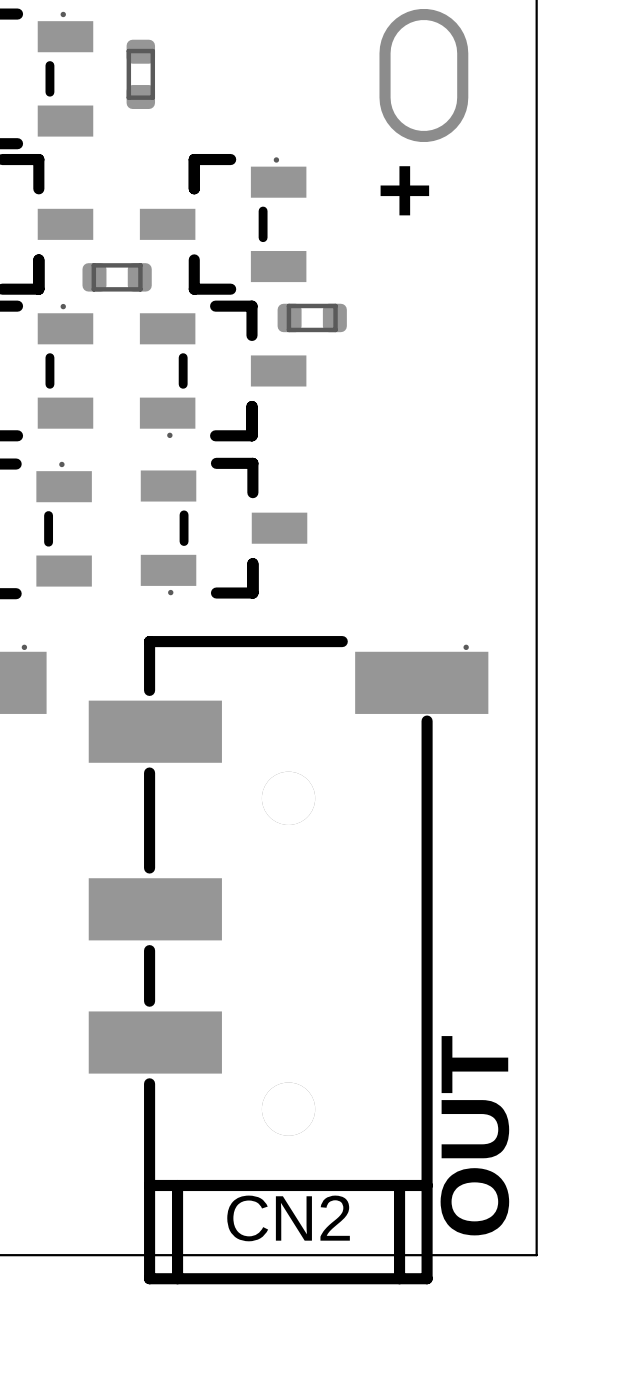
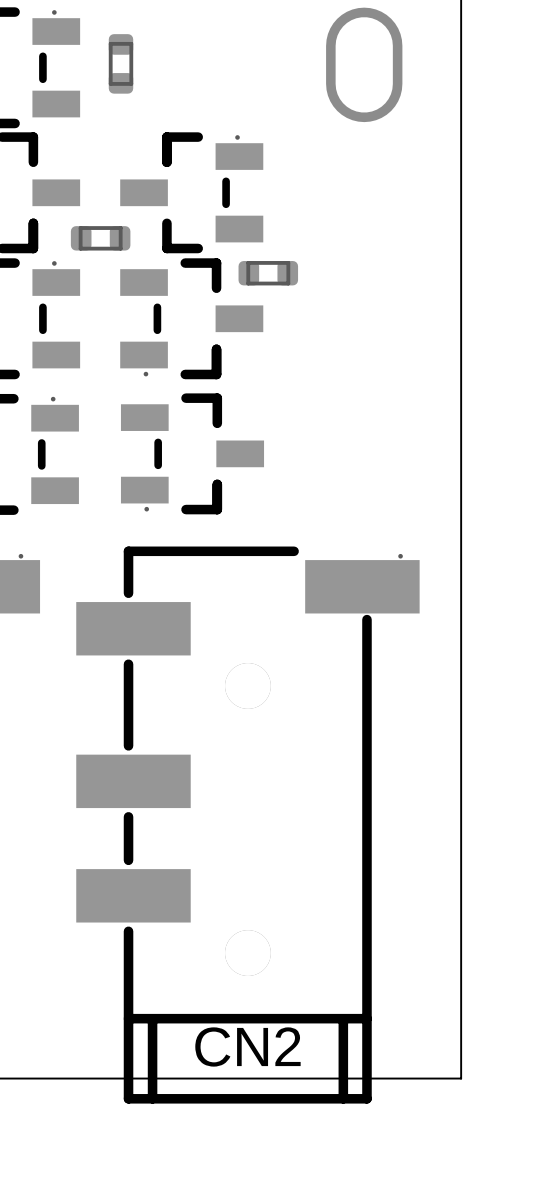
text: + (404, 190) -> none
text: OUT (474, 1135) -> none

